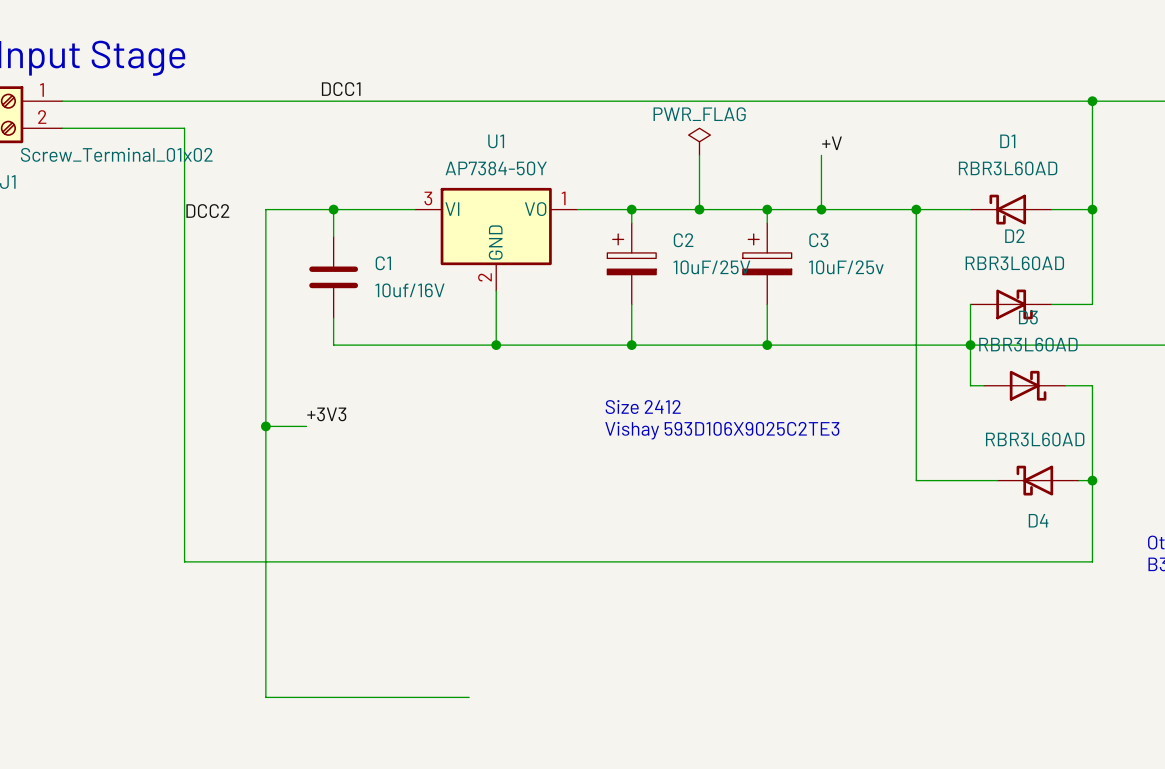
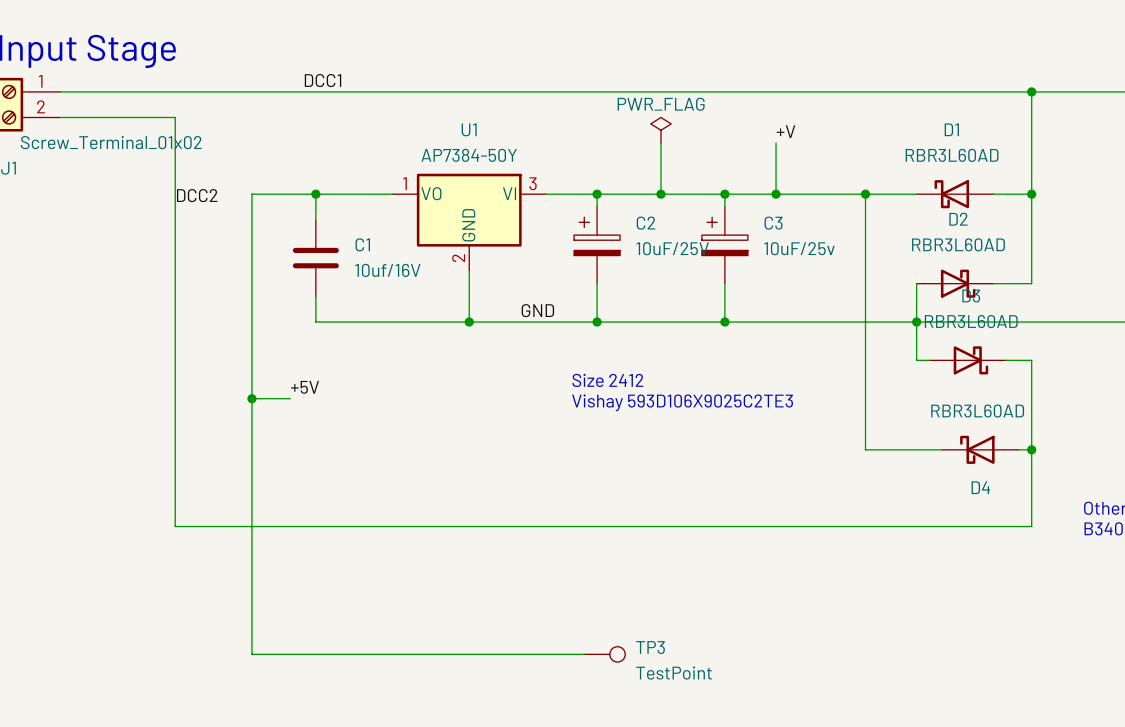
U1 flip: as is (496, 226) -> left-right (469, 210)
label: none -> GND (537, 310)
label: +3V3 (326, 414) -> +5V (304, 387)
wire: none -> (443, 654) (584, 654)
TP3: none -> TestPoint (604, 654)

